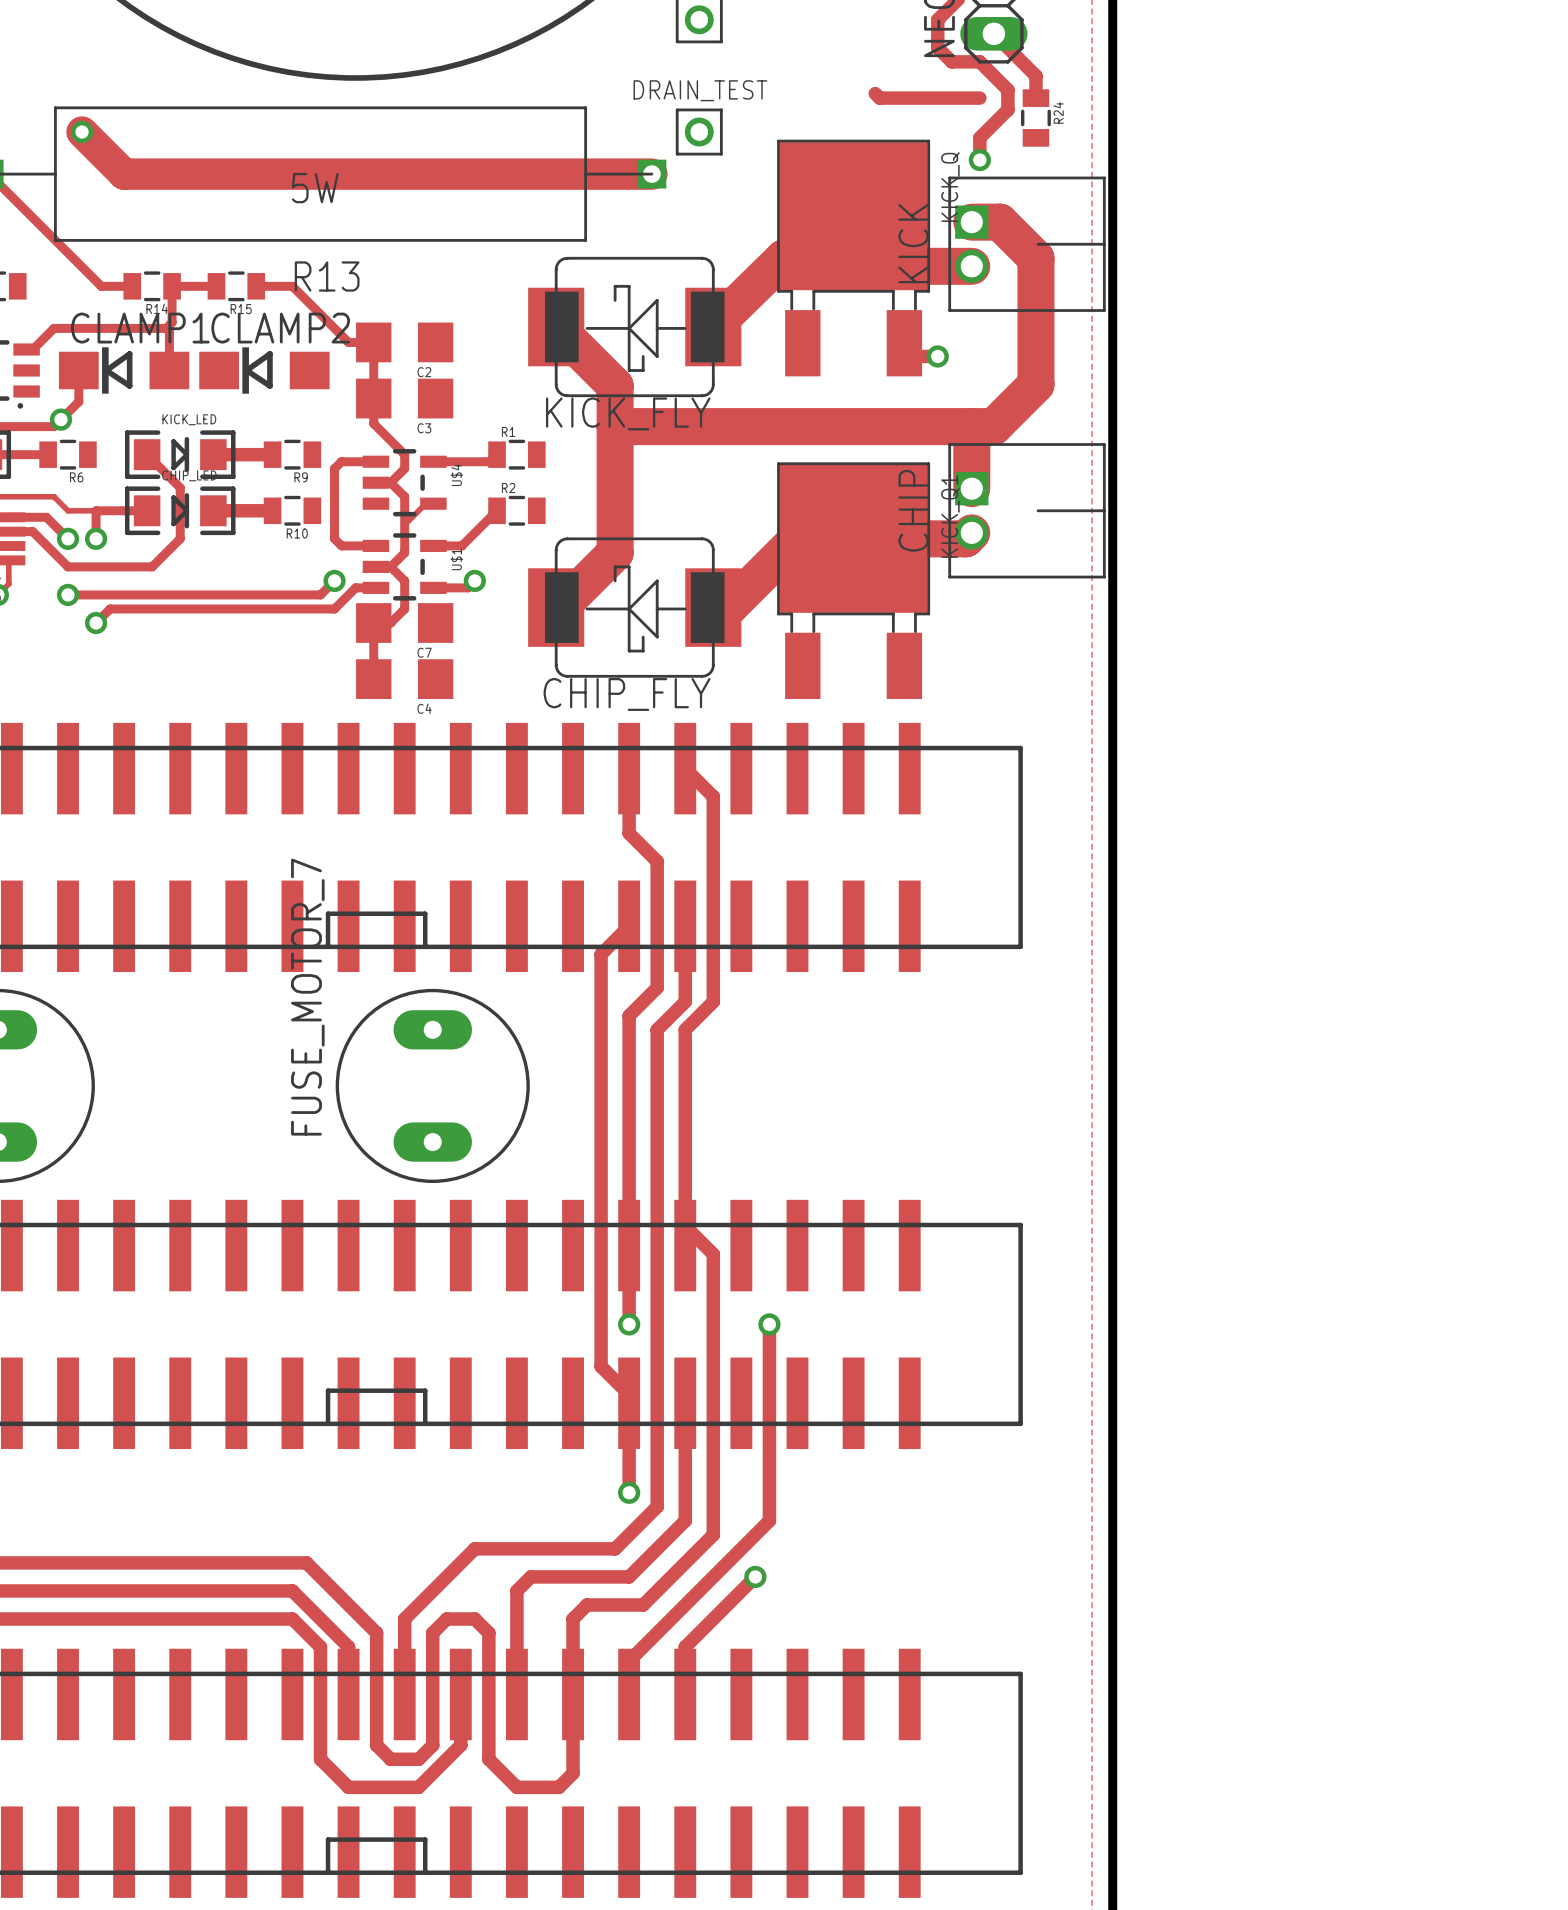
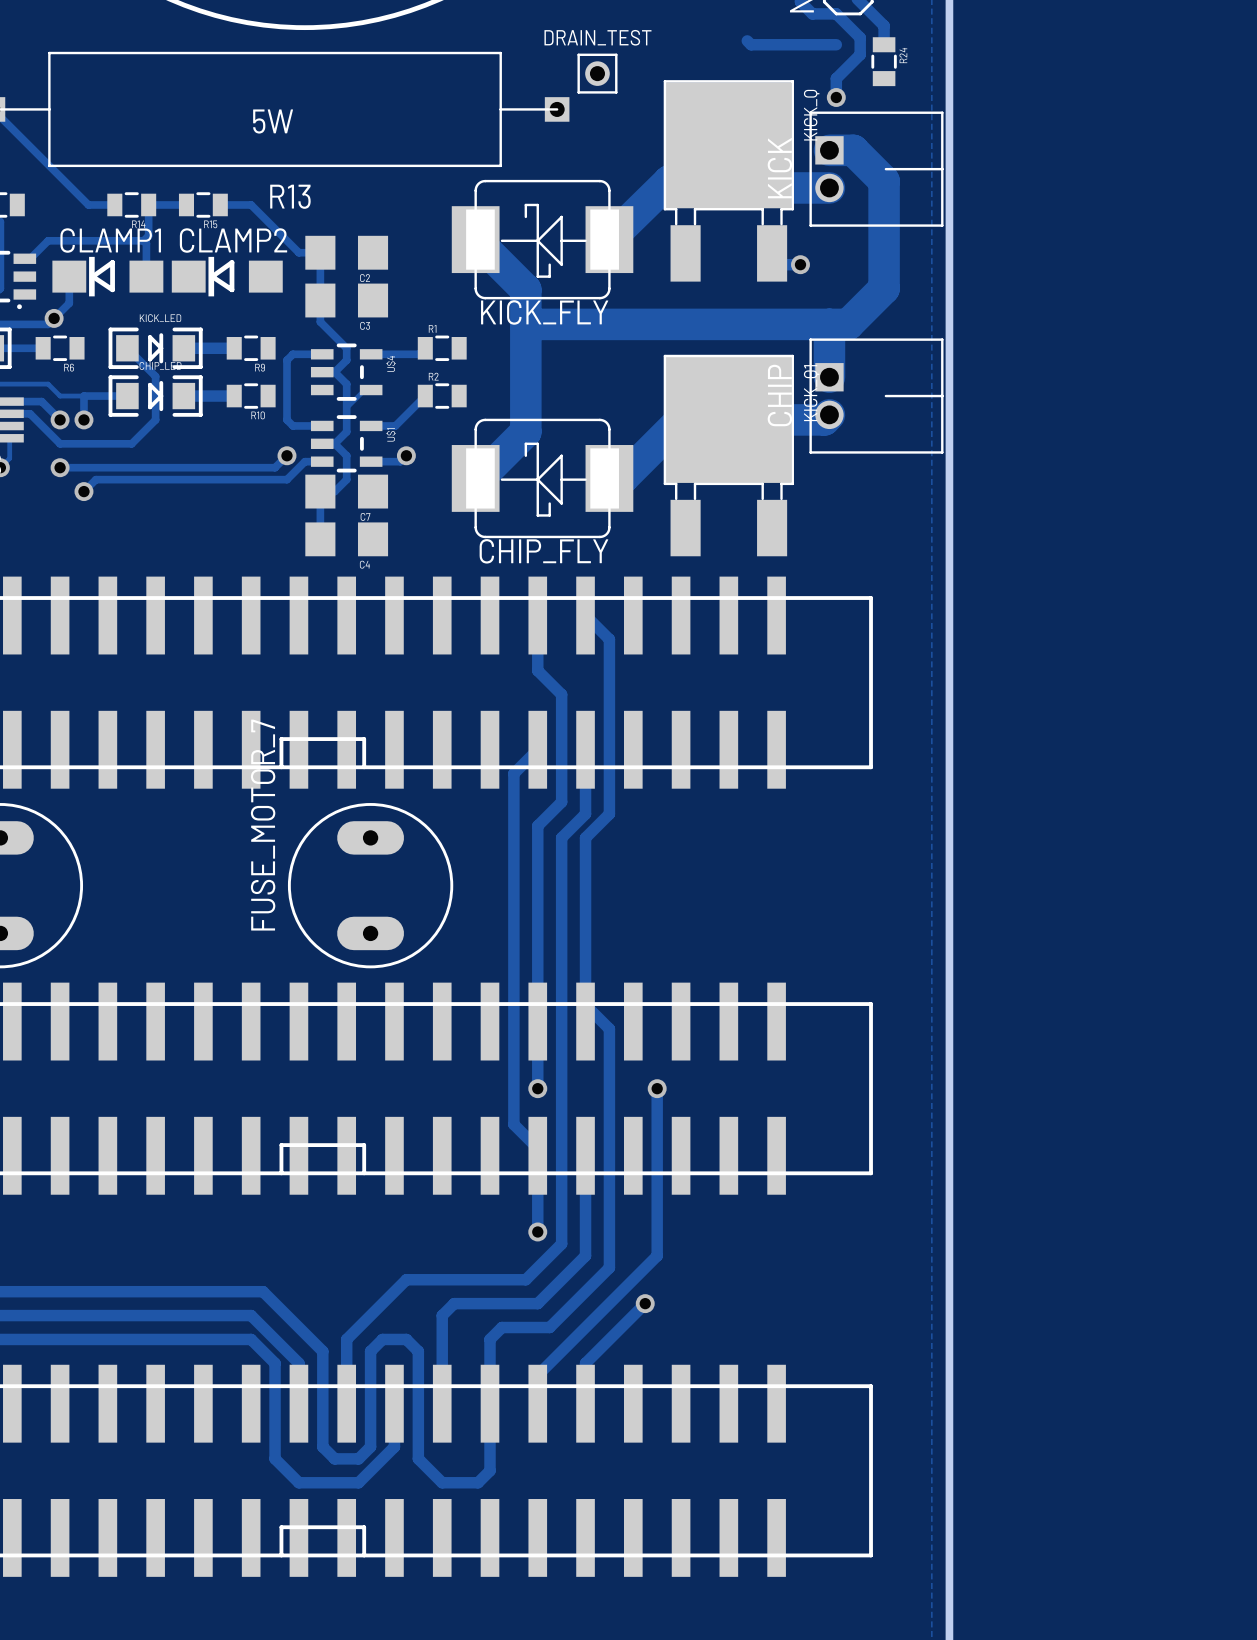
track: (82, 132) (124, 174) (651, 174) -> none
via: (82, 132) -> none

